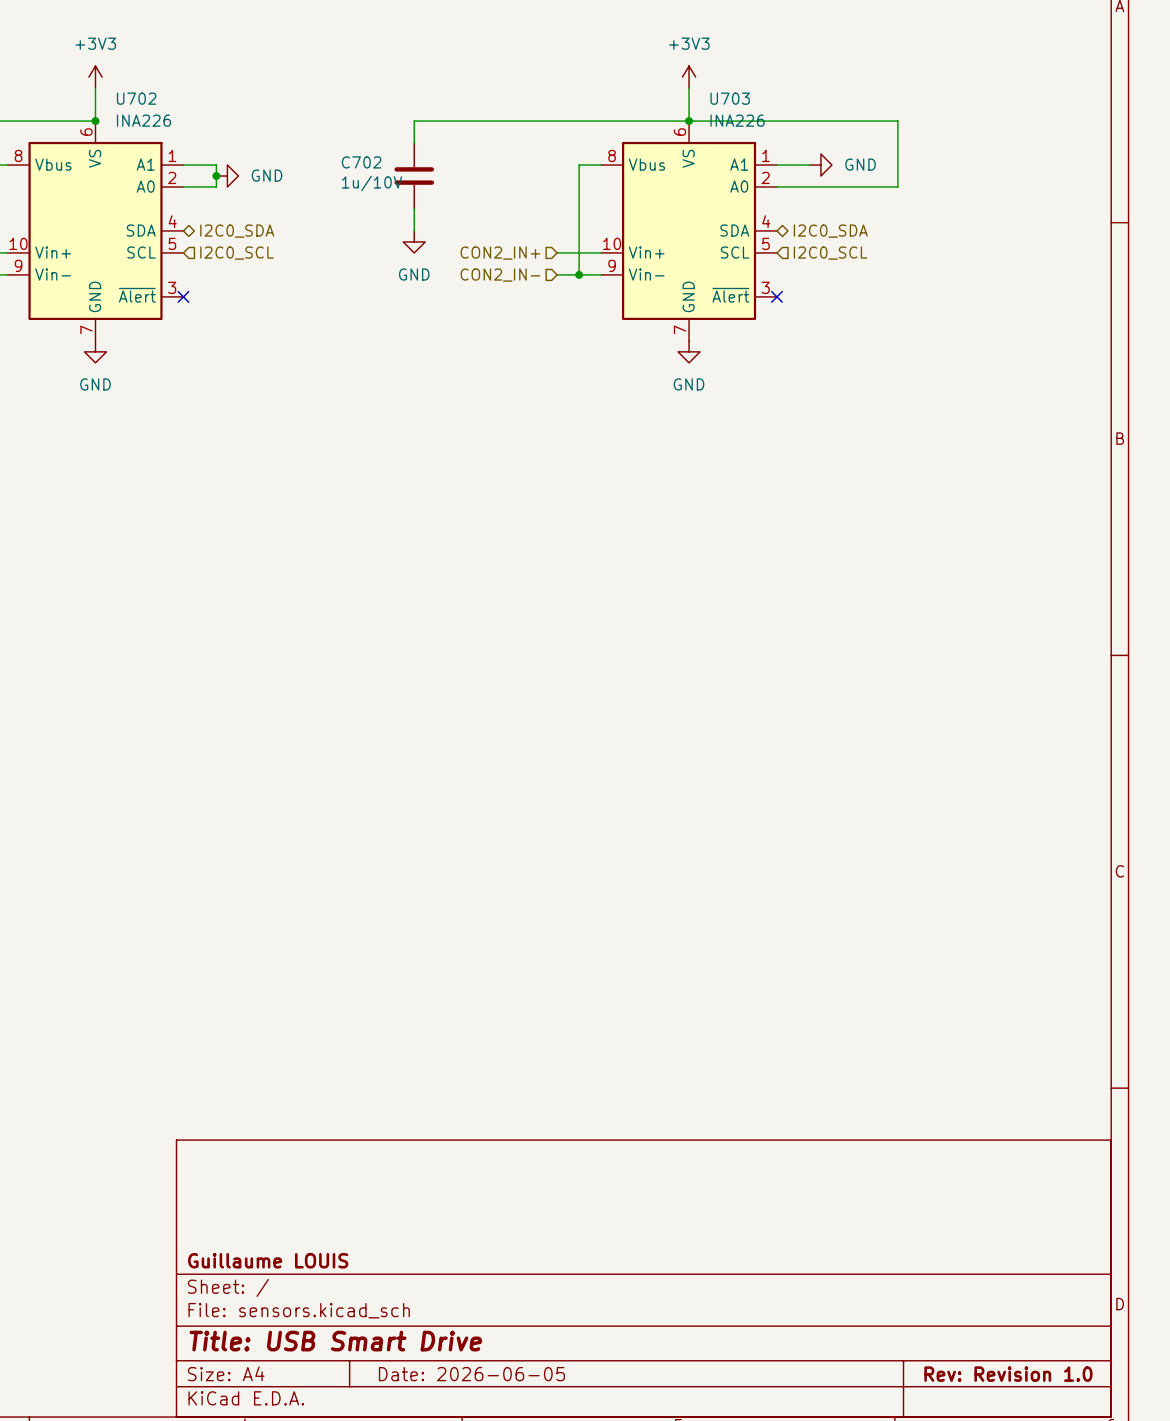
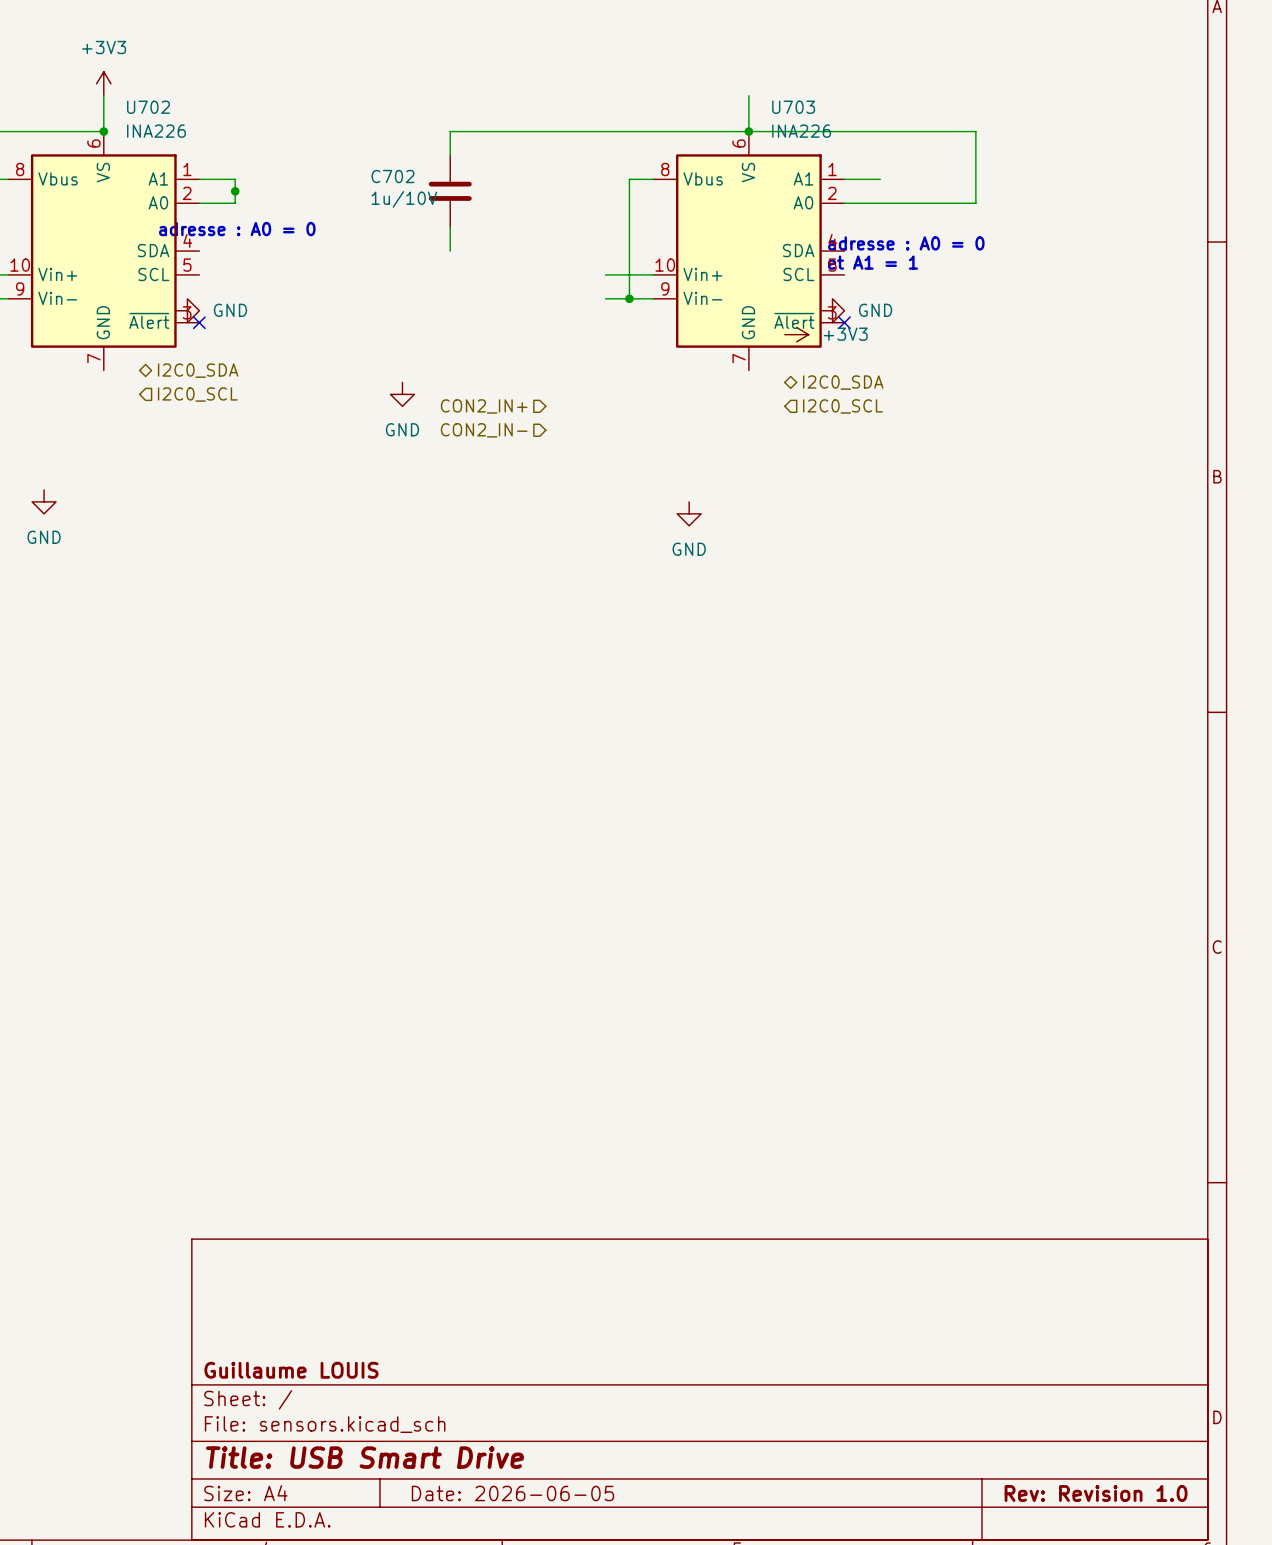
power symbol: +3V3 (689, 77) -> none
power symbol: GND (820, 165) -> none
power symbol: GND (227, 176) -> none
text: none -> adresse : A0 = 0 (237, 229)
text: none -> adresse : A0 = 0 (906, 243)
hierarchical label position: I2C0_SDA (237, 231) -> I2C0_SDA (198, 370)
hierarchical label position: I2C0_SDA (830, 231) -> I2C0_SDA (843, 382)
power symbol: GND (414, 241) -> none
text: none -> et A1 = 1 (873, 262)
hierarchical label position: I2C0_SCL (236, 253) -> I2C0_SCL (197, 394)
hierarchical label position: CON2_IN+ (500, 253) -> CON2_IN+ (484, 406)
hierarchical label position: I2C0_SCL (830, 253) -> I2C0_SCL (842, 406)
hierarchical label position: CON2_IN- (500, 275) -> CON2_IN- (484, 430)
power symbol: none -> GND (187, 310)
power symbol: none -> GND (832, 310)
power symbol: none -> +3V3 (796, 334)
power symbol: GND (95, 351) -> none
power symbol: GND (689, 351) -> none
power symbol: none -> GND (402, 394)
power symbol: none -> GND (44, 501)
power symbol: none -> GND (689, 513)

